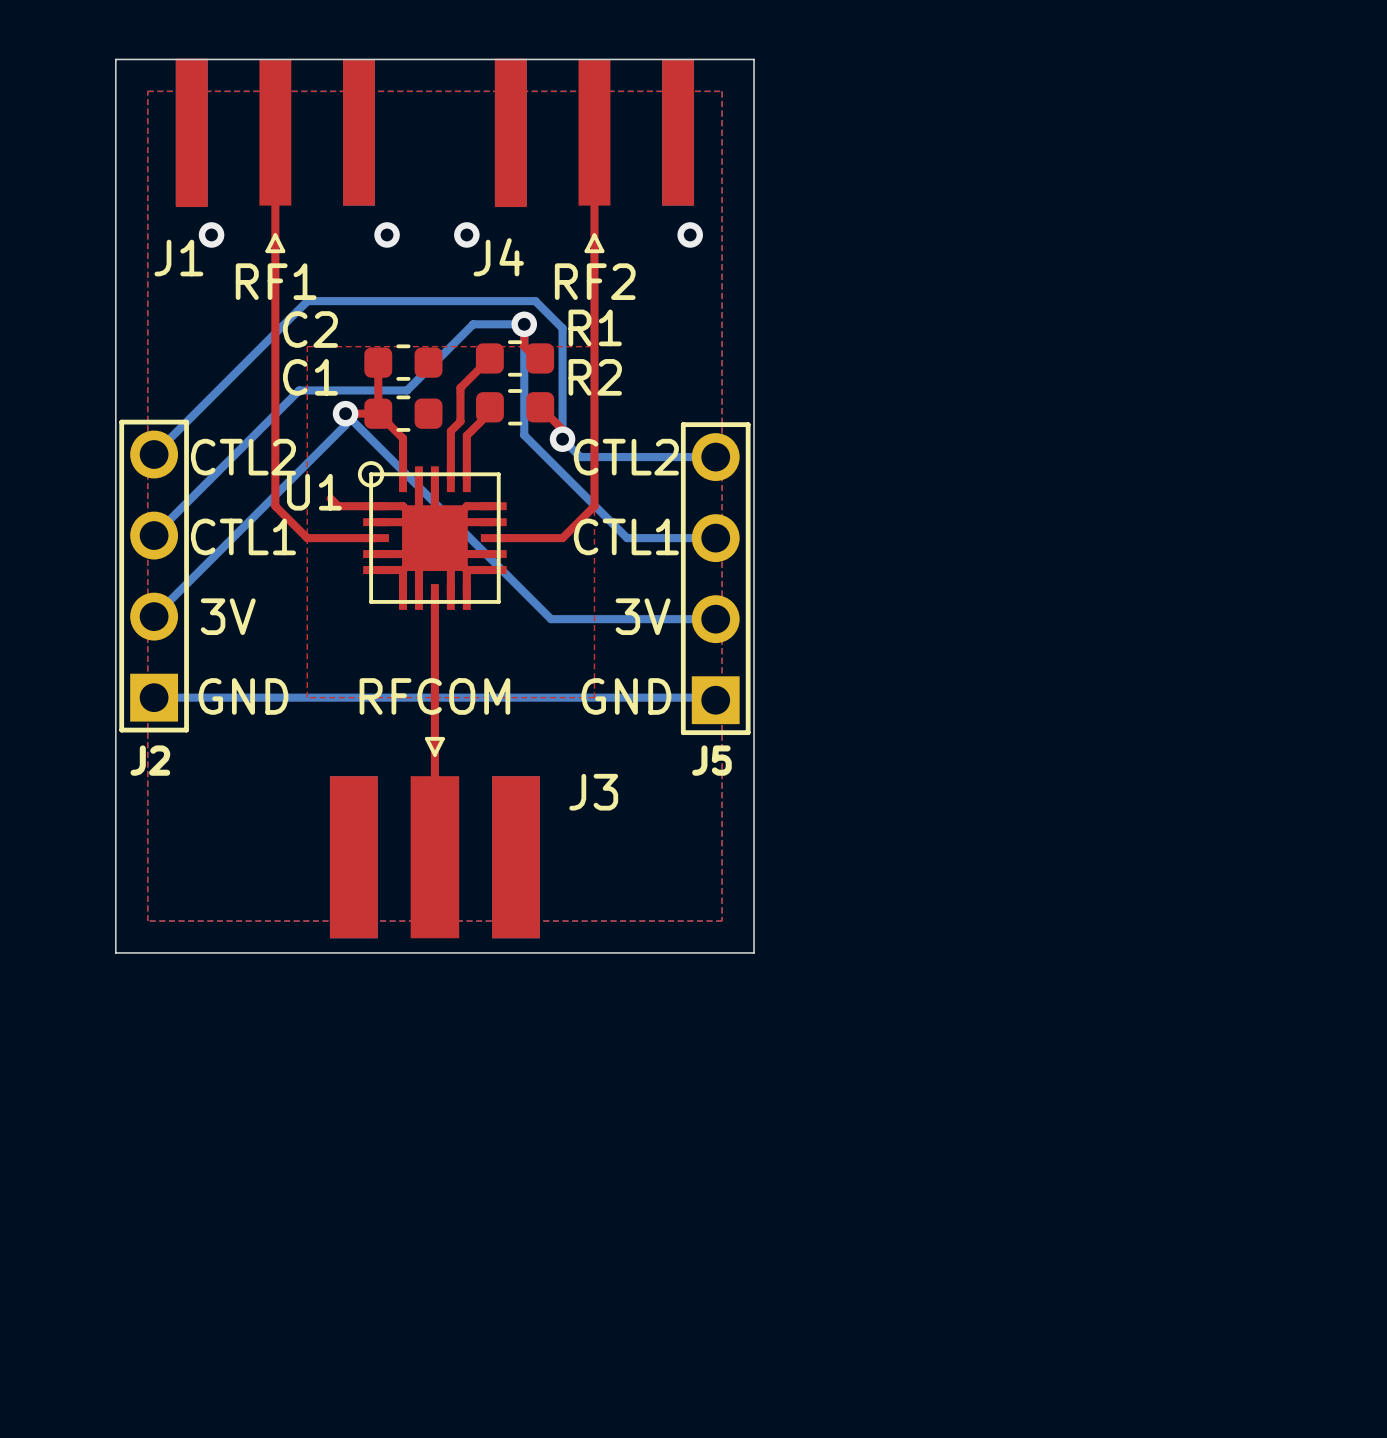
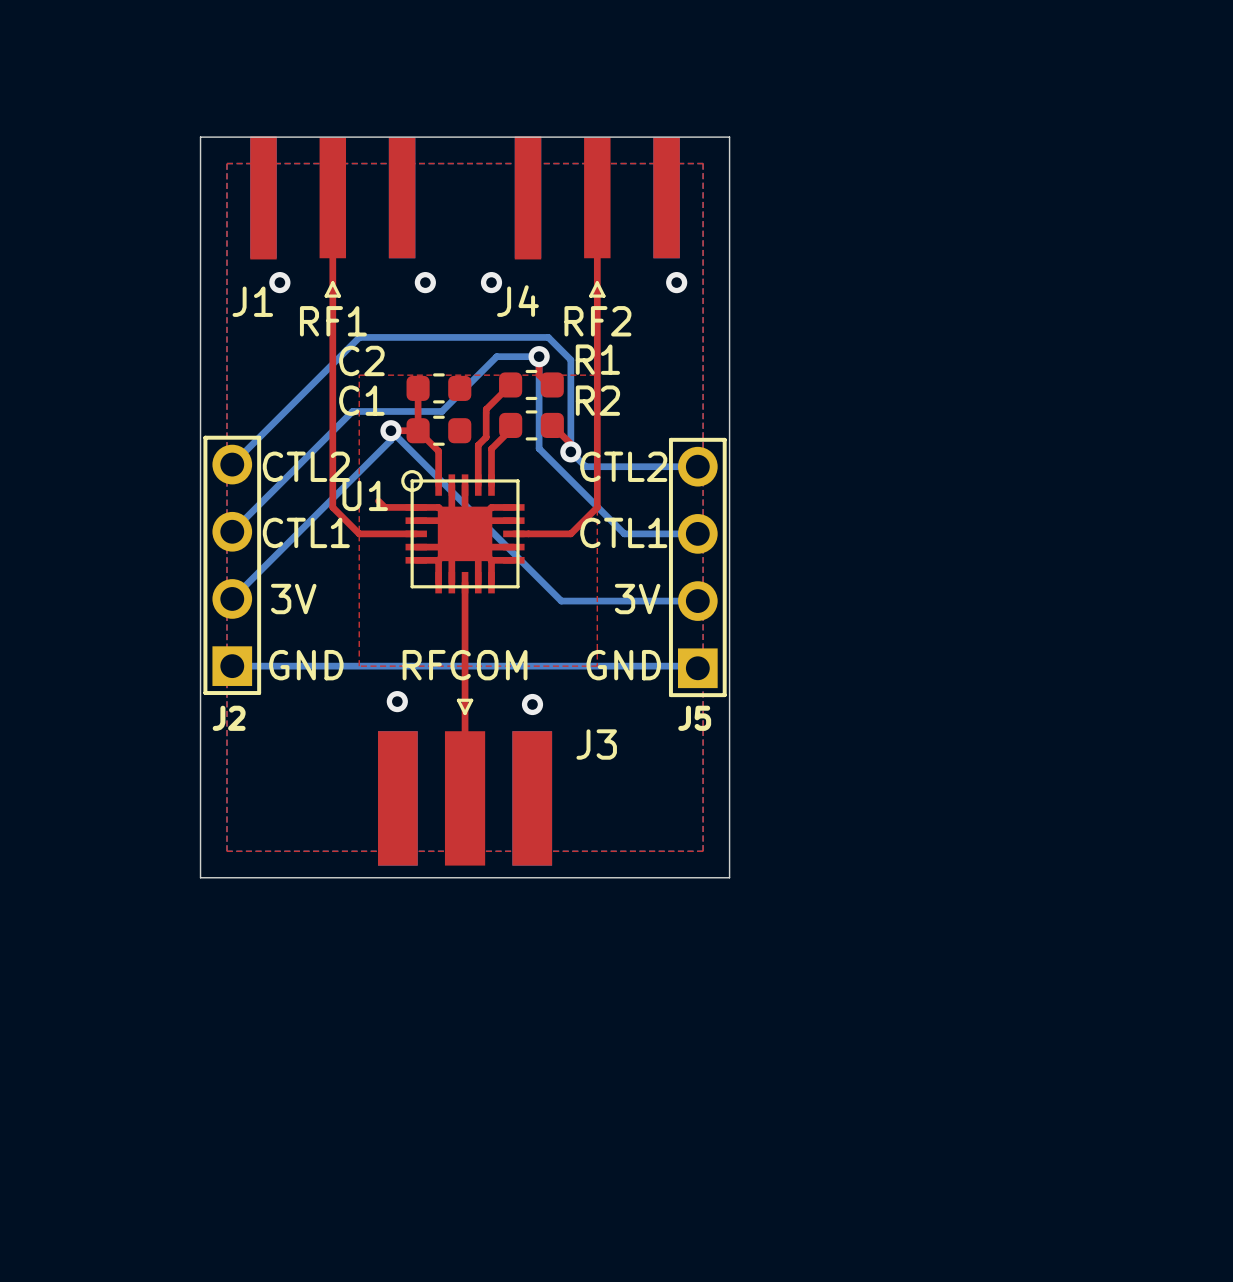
via: none -> (397, 701)
via: none -> (532, 704)

